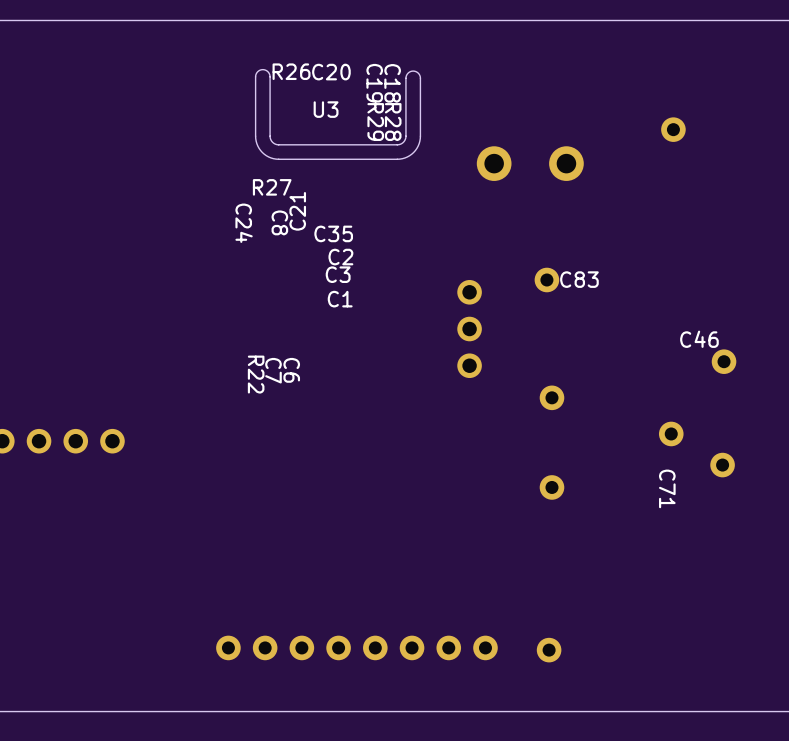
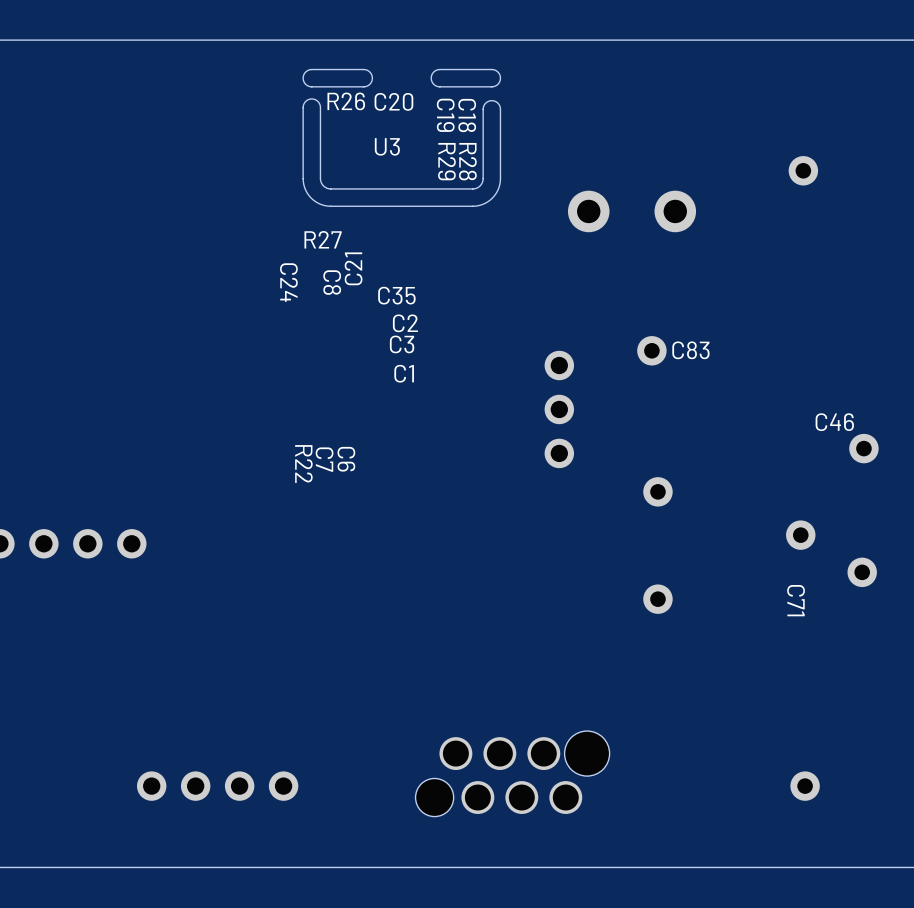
board edge: none -> (363, 69) (310, 69) (304, 72) (303, 79) (305, 84) (310, 86) (364, 86) (370, 83) (372, 77) (368, 71) (363, 69)
board edge: none -> (491, 69) (438, 69) (433, 72) (431, 79) (433, 84) (438, 86) (492, 86) (498, 83) (500, 77) (497, 71) (491, 69)
part: none -> (512, 773)
part: none -> (217, 786)
part: (356, 647) -> none
part position: (549, 650) -> (805, 786)

